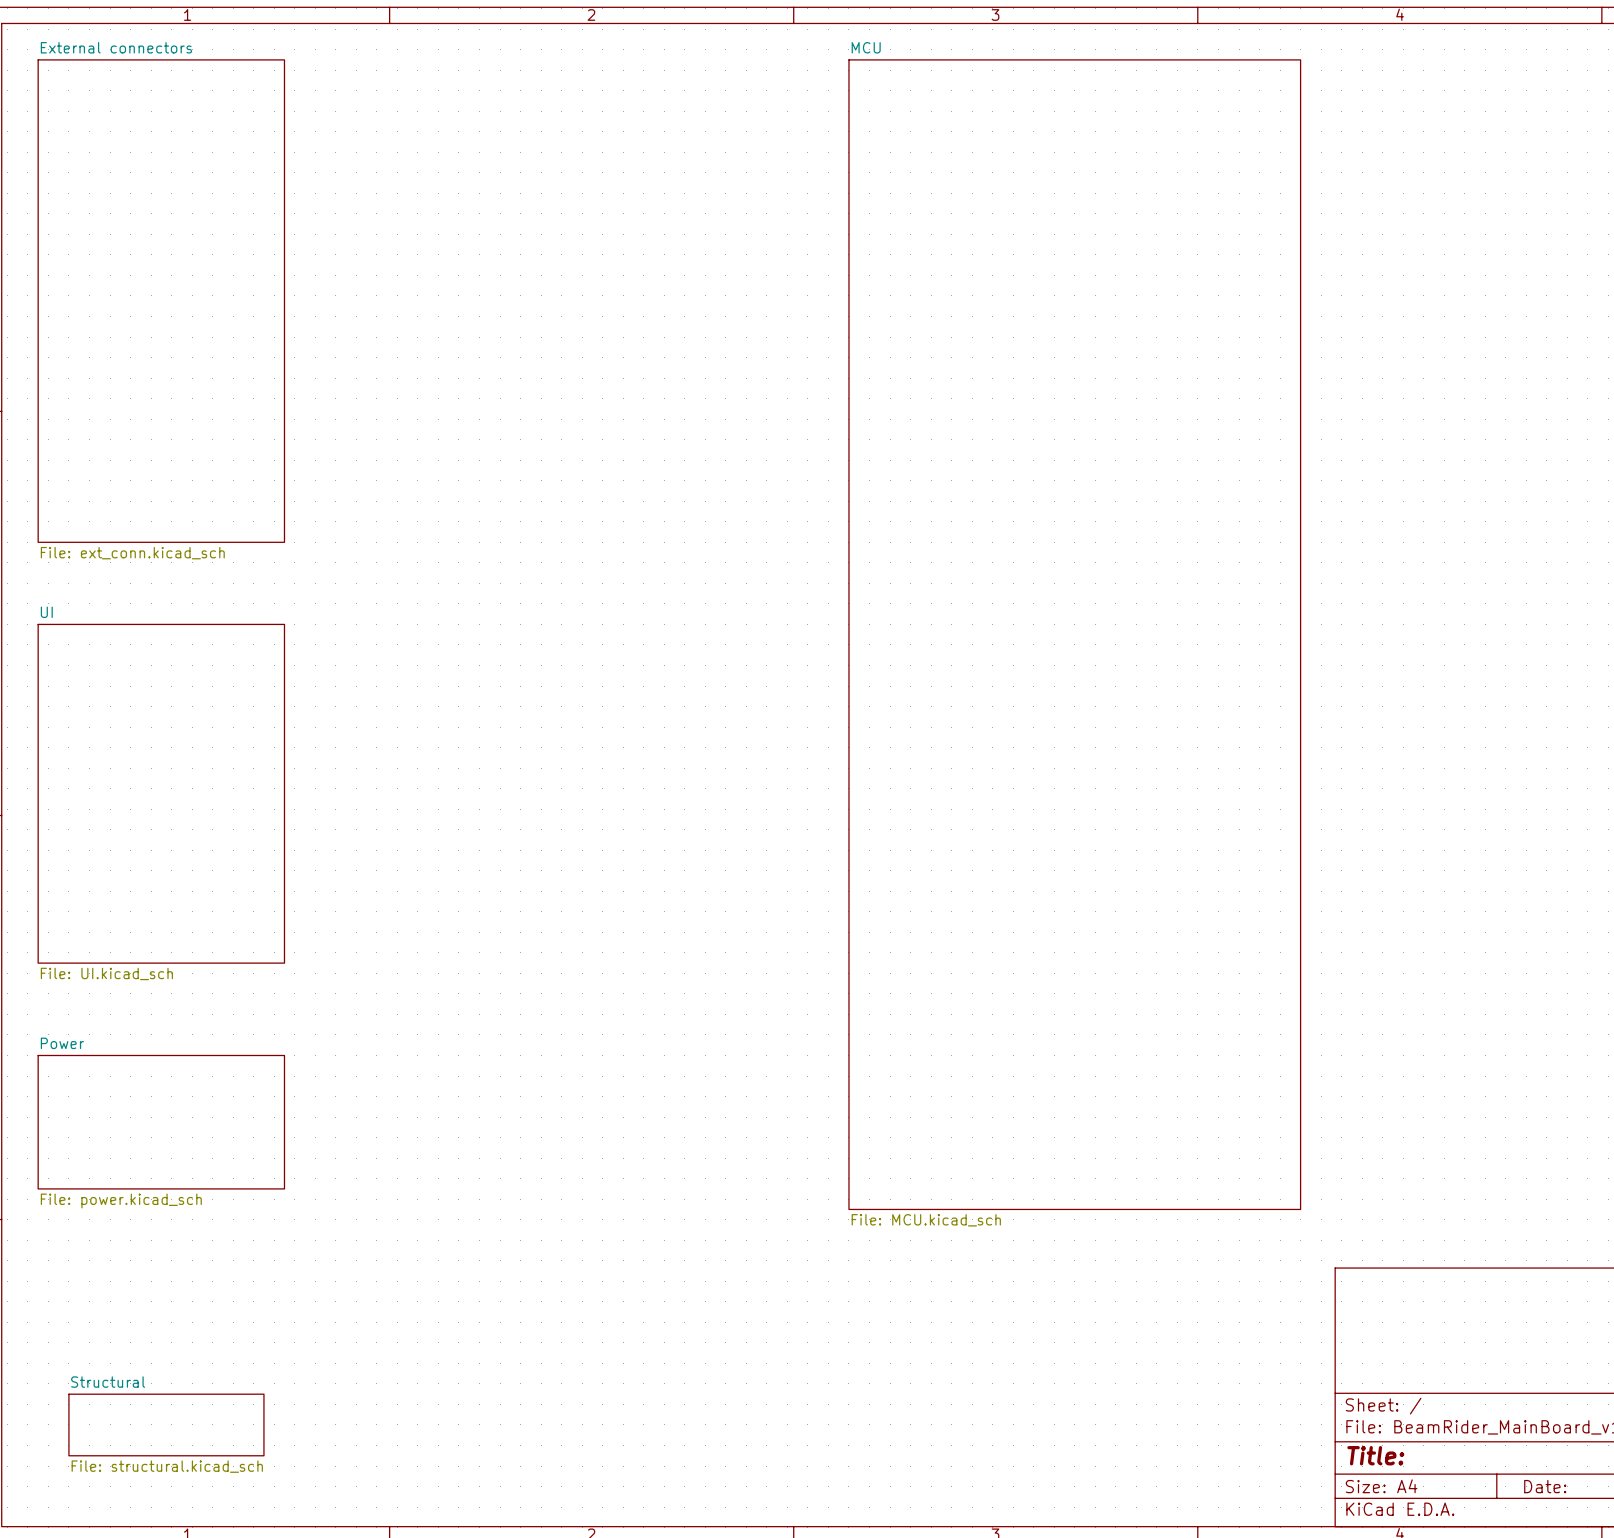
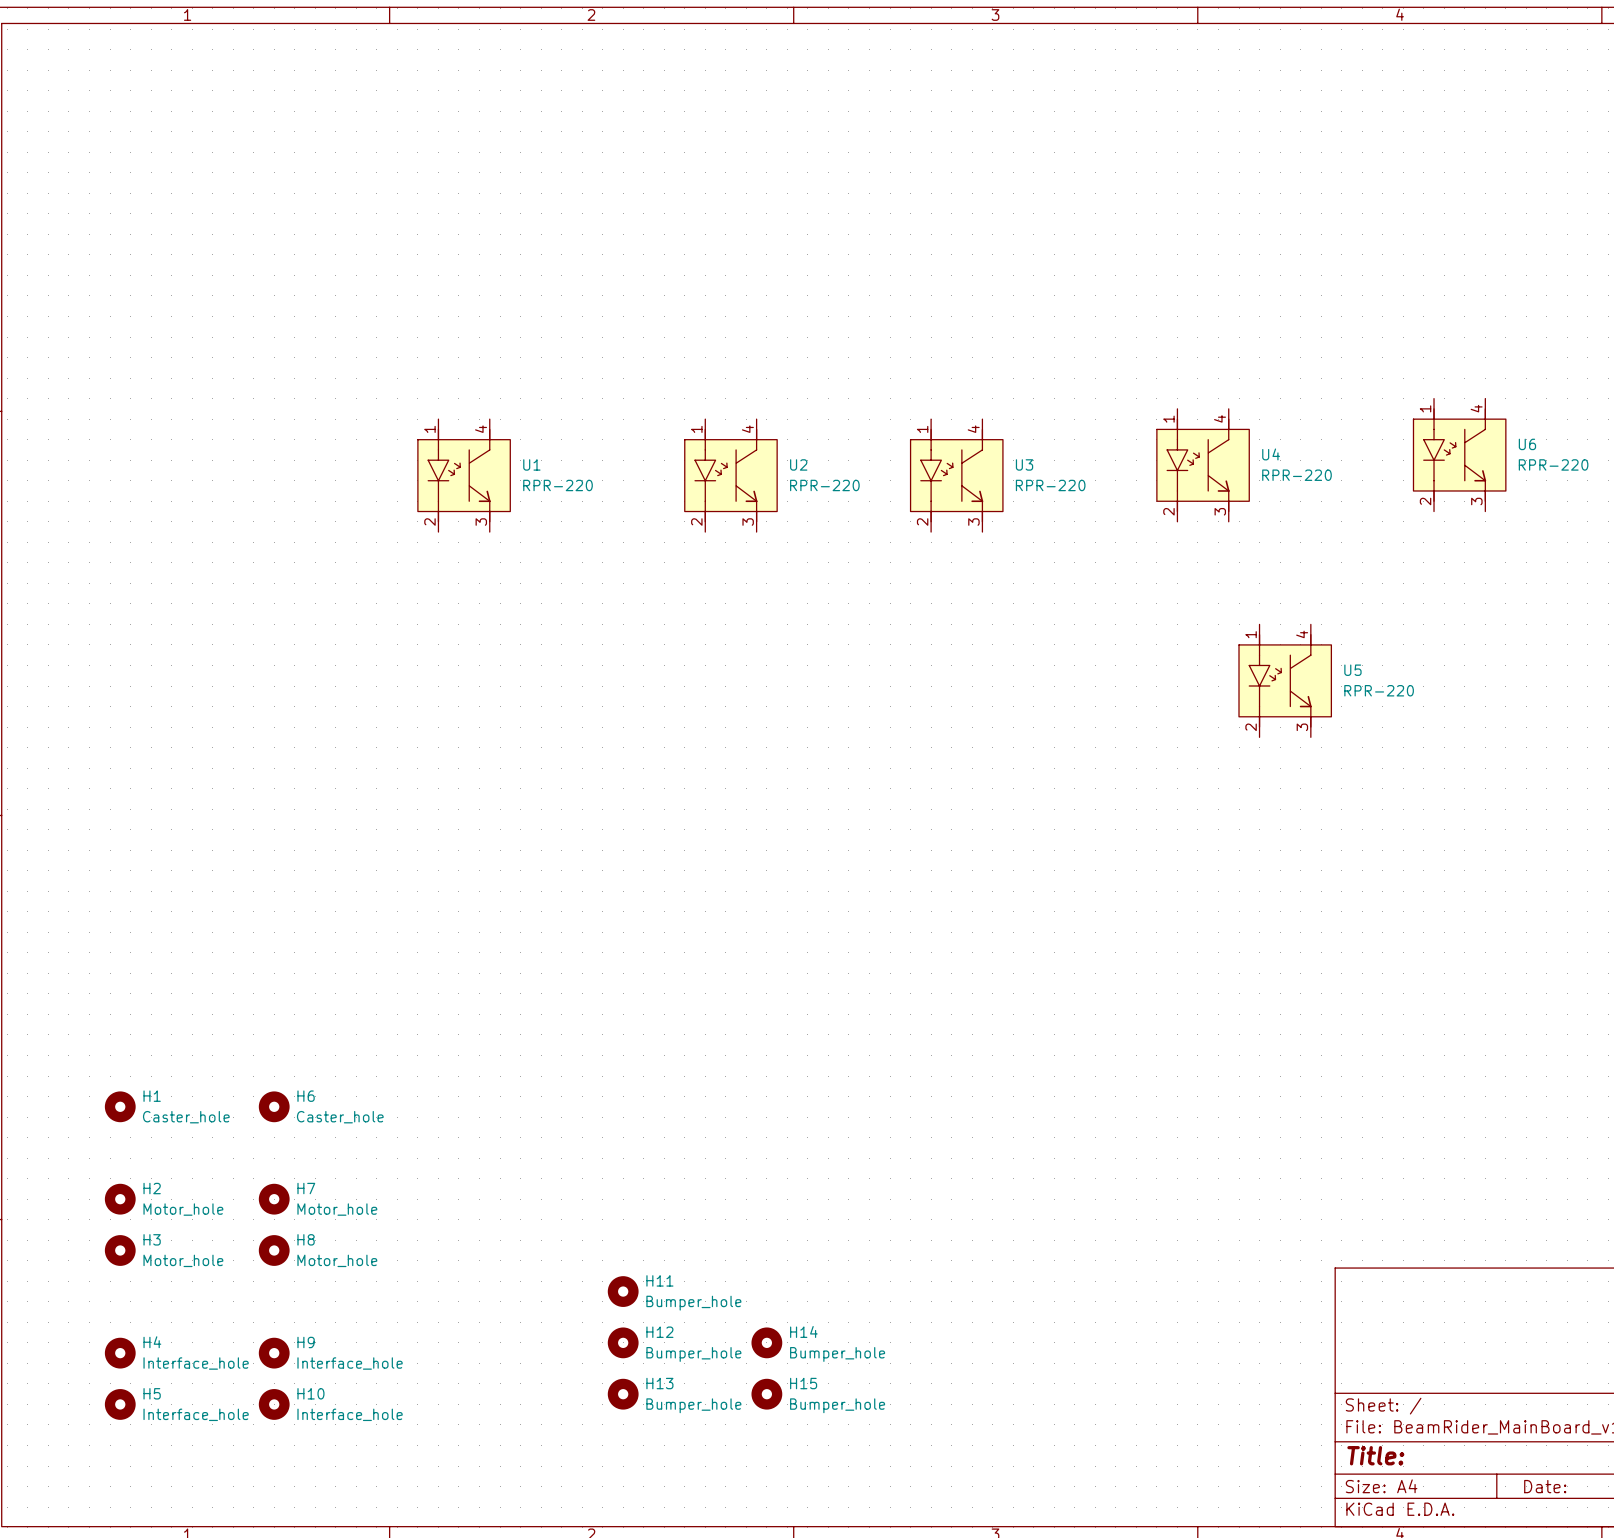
sheet External connectors: File: ext_conn.kicad_sch (161, 301) -> none
U6: none -> RPR-220 (1459, 455)
U4: none -> RPR-220 (1203, 465)
U1: none -> RPR-220 (464, 475)
U2: none -> RPR-220 (730, 475)
U3: none -> RPR-220 (956, 475)
sheet MCU: File: MCU.kicad_sch (1074, 634) -> none
U5: none -> RPR-220 (1285, 680)
sheet UI: File: UI.kicad_sch (161, 793) -> none
H1: none -> Caster_hole (120, 1106)
H6: none -> Caster_hole (274, 1106)
sheet Power: File: power.kicad_sch (161, 1122) -> none
H2: none -> Motor_hole (120, 1199)
H7: none -> Motor_hole (274, 1199)
H3: none -> Motor_hole (120, 1250)
H8: none -> Motor_hole (274, 1250)
H11: none -> Bumper_hole (623, 1291)
H12: none -> Bumper_hole (623, 1342)
H14: none -> Bumper_hole (766, 1342)
H4: none -> Interface_hole (120, 1353)
H9: none -> Interface_hole (274, 1353)
H13: none -> Bumper_hole (623, 1394)
H15: none -> Bumper_hole (766, 1394)
H5: none -> Interface_hole (120, 1404)
H10: none -> Interface_hole (274, 1404)
sheet Structural: File: structural.kicad_sch (166, 1424) -> none

